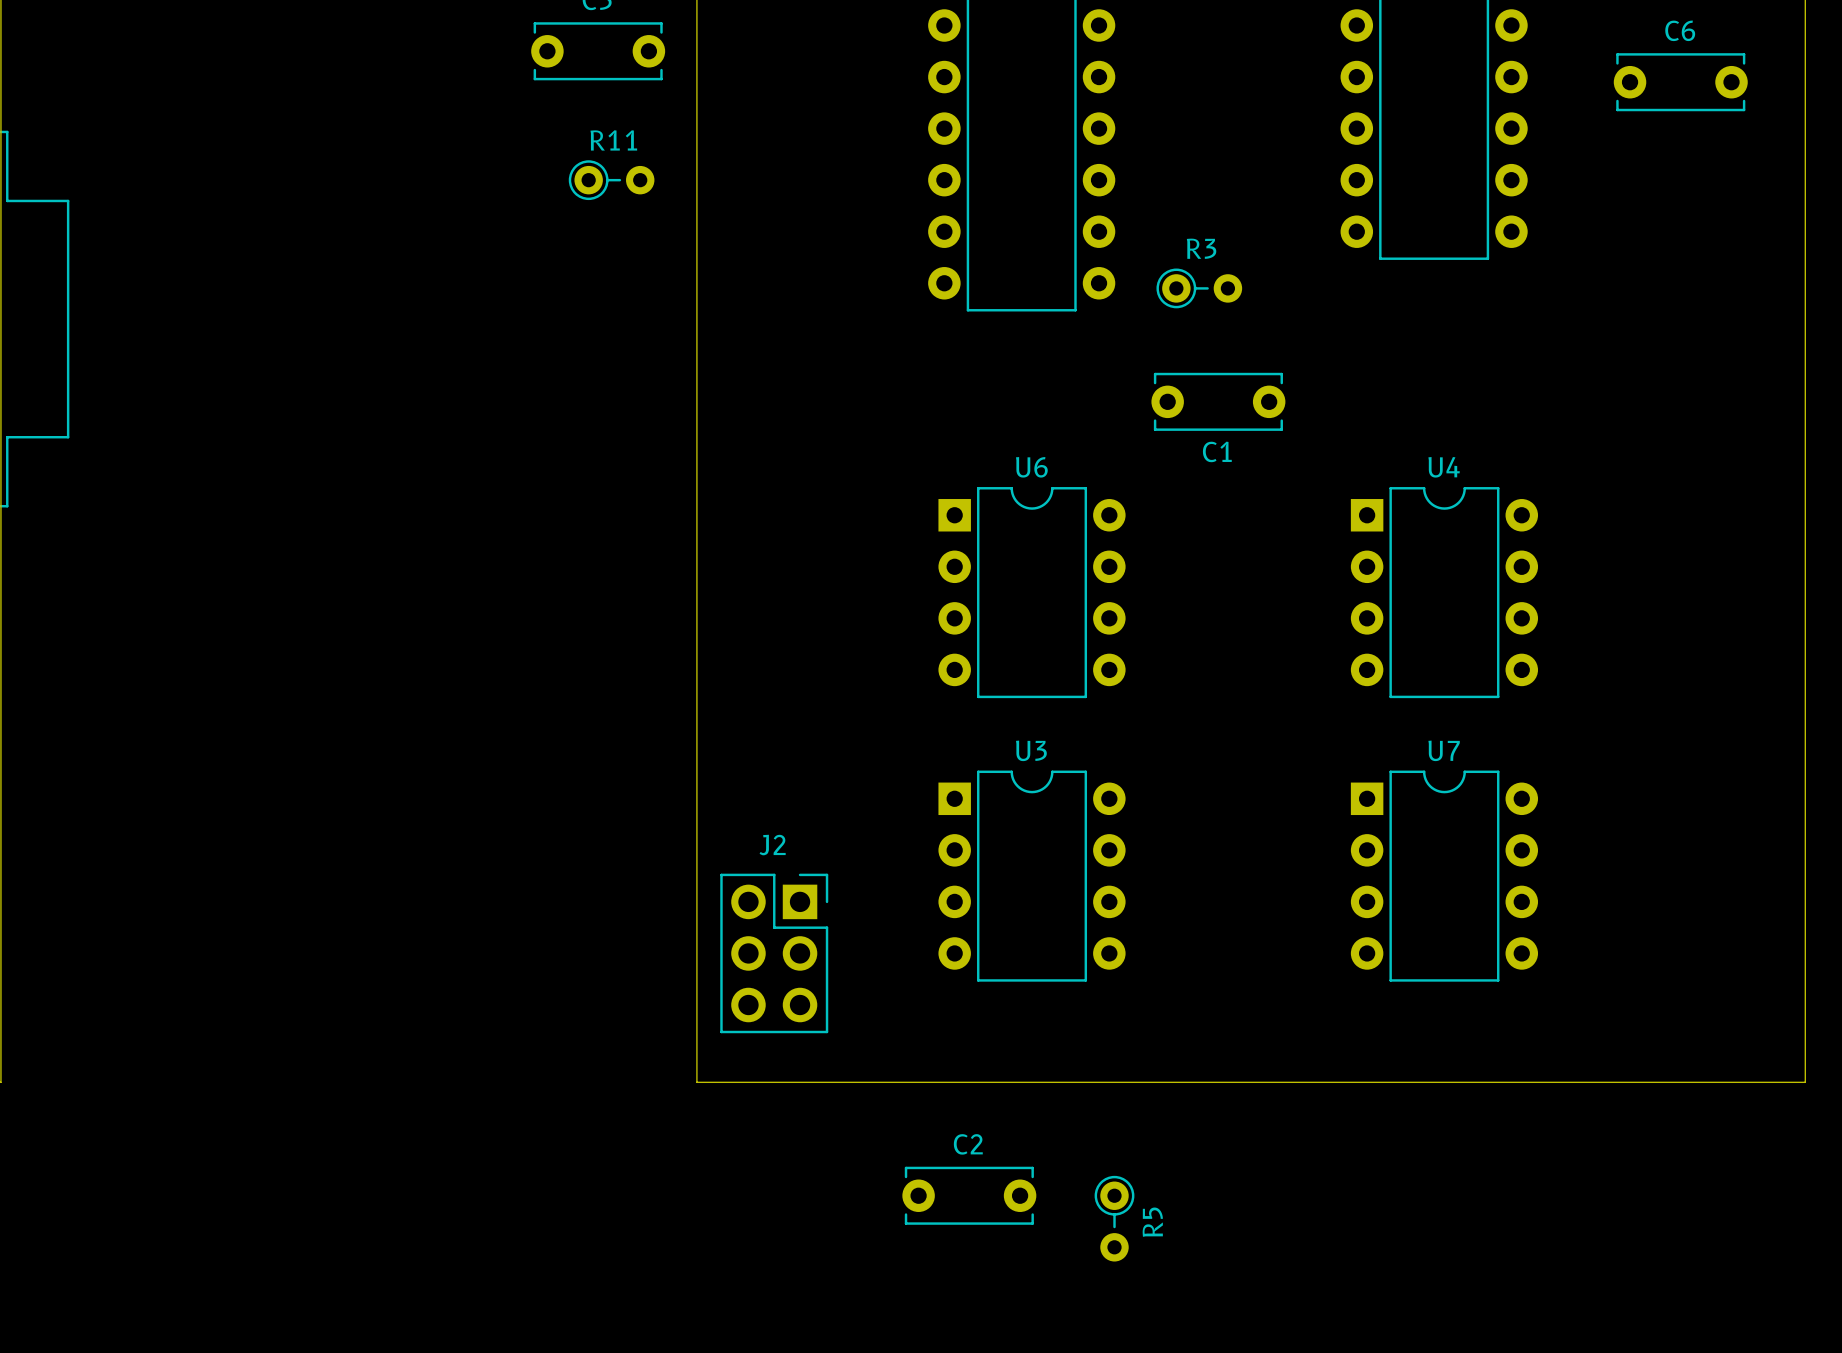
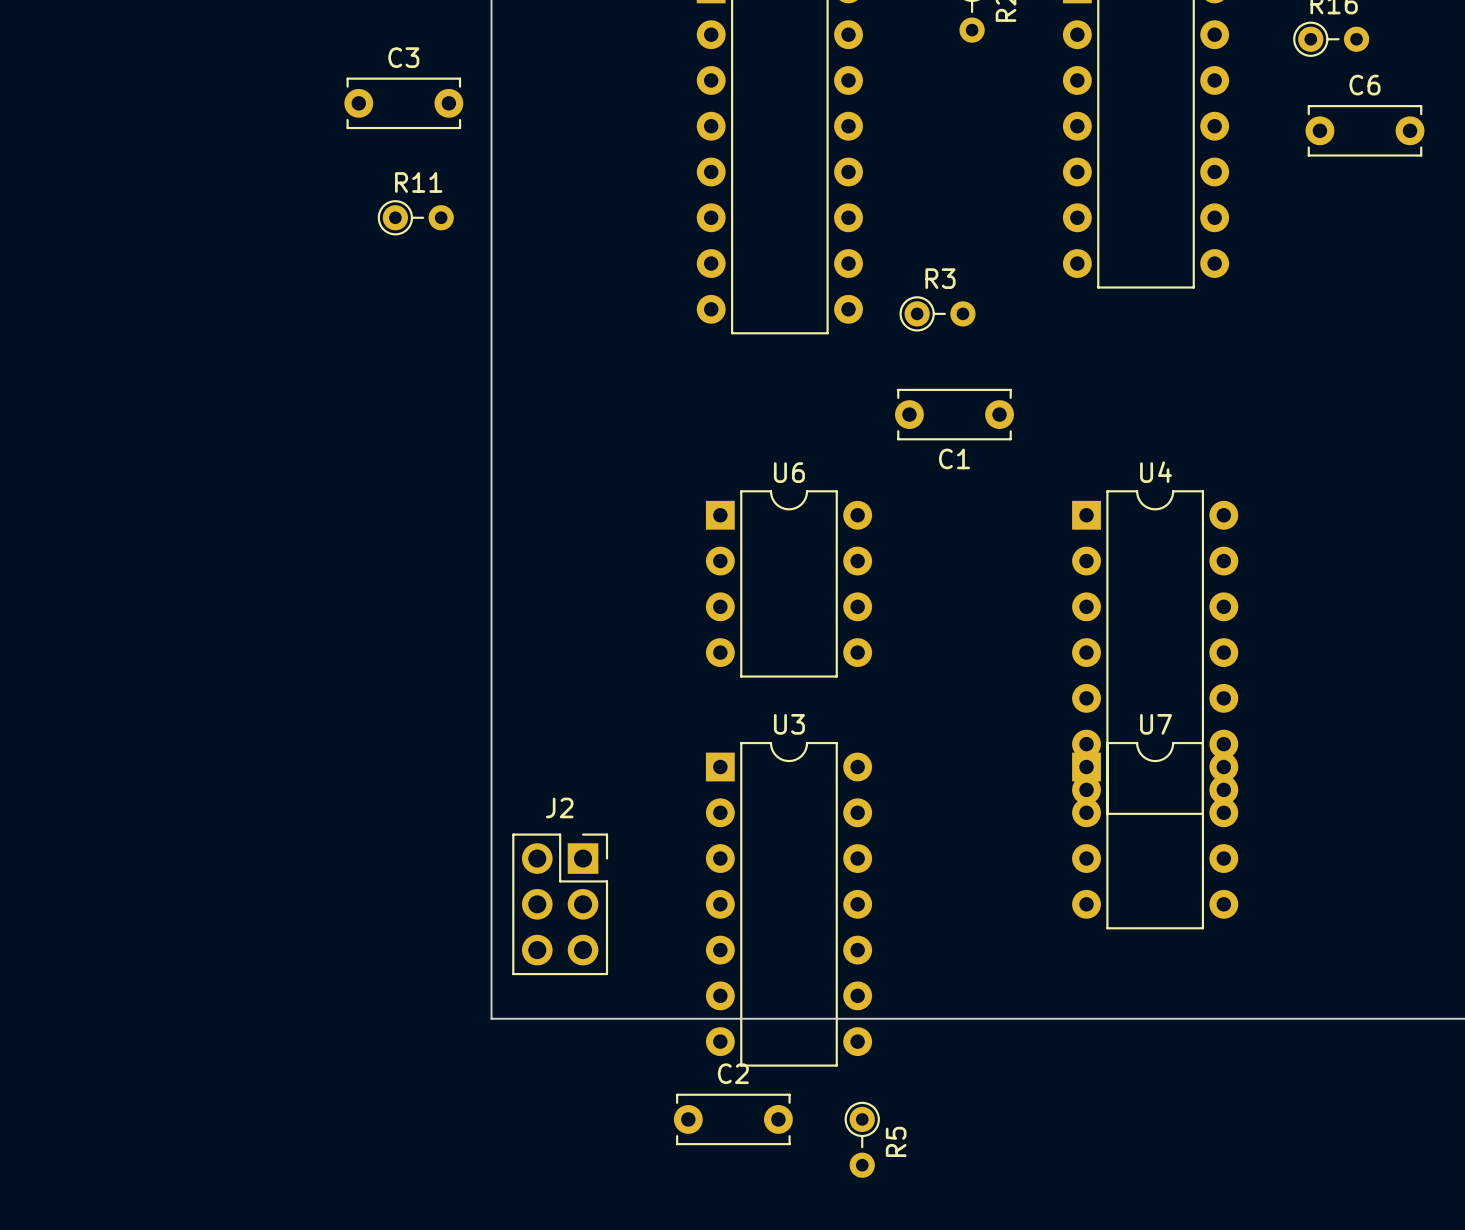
U4 footprint: [1350, 487, 1539, 699] -> [1072, 490, 1239, 815]
U3 footprint: [938, 770, 1126, 982] -> [705, 741, 873, 1067]

